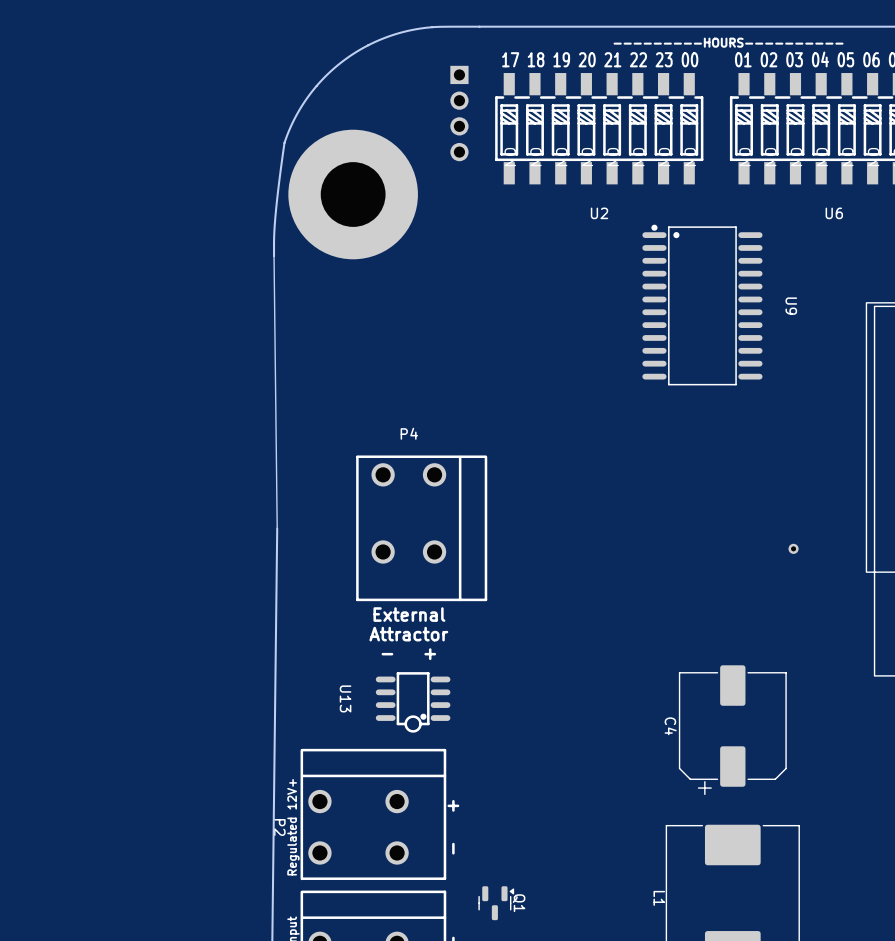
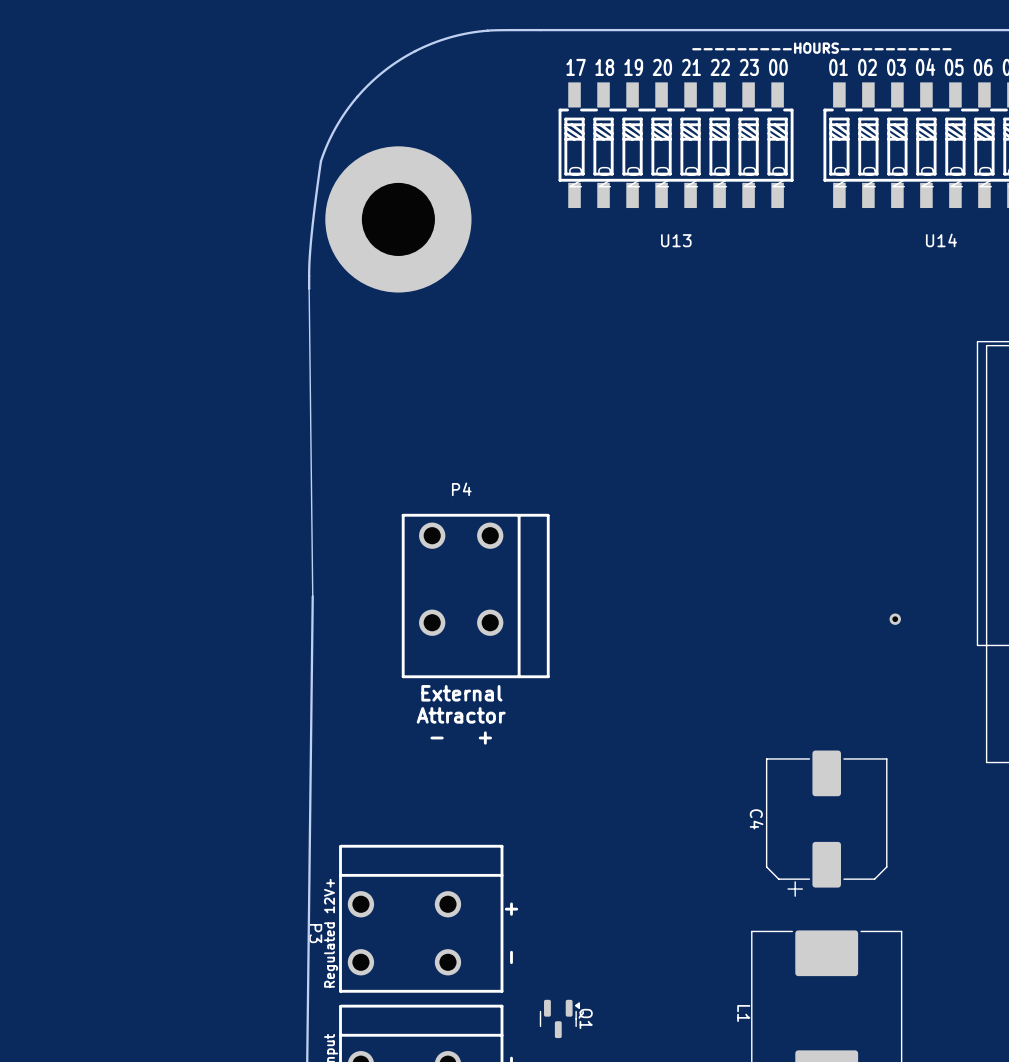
part: (459, 113) -> none
U2 name: U2 (599, 213) -> U13 (676, 240)
U6 name: U6 (834, 213) -> U14 (941, 240)
U9: (702, 305) -> none
U13: (413, 702) -> none
P2 name: P2 (279, 827) -> P3 (315, 933)

